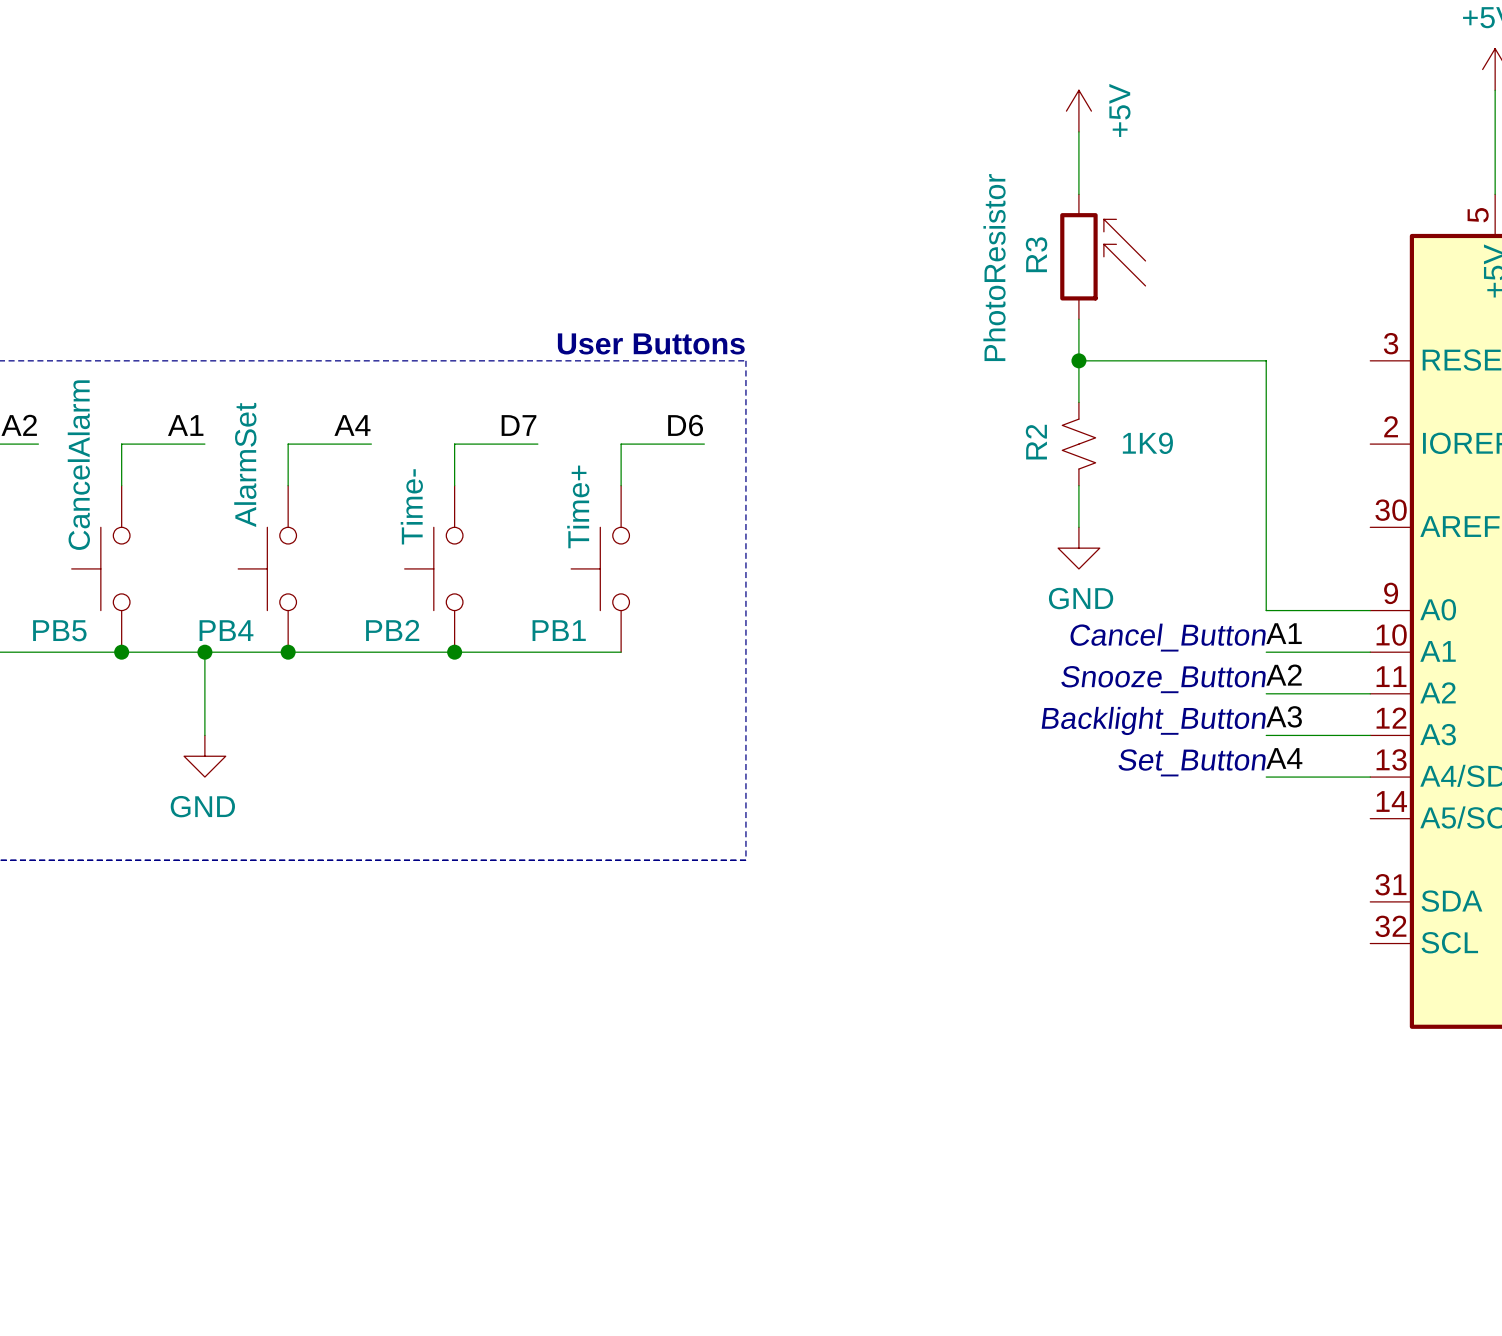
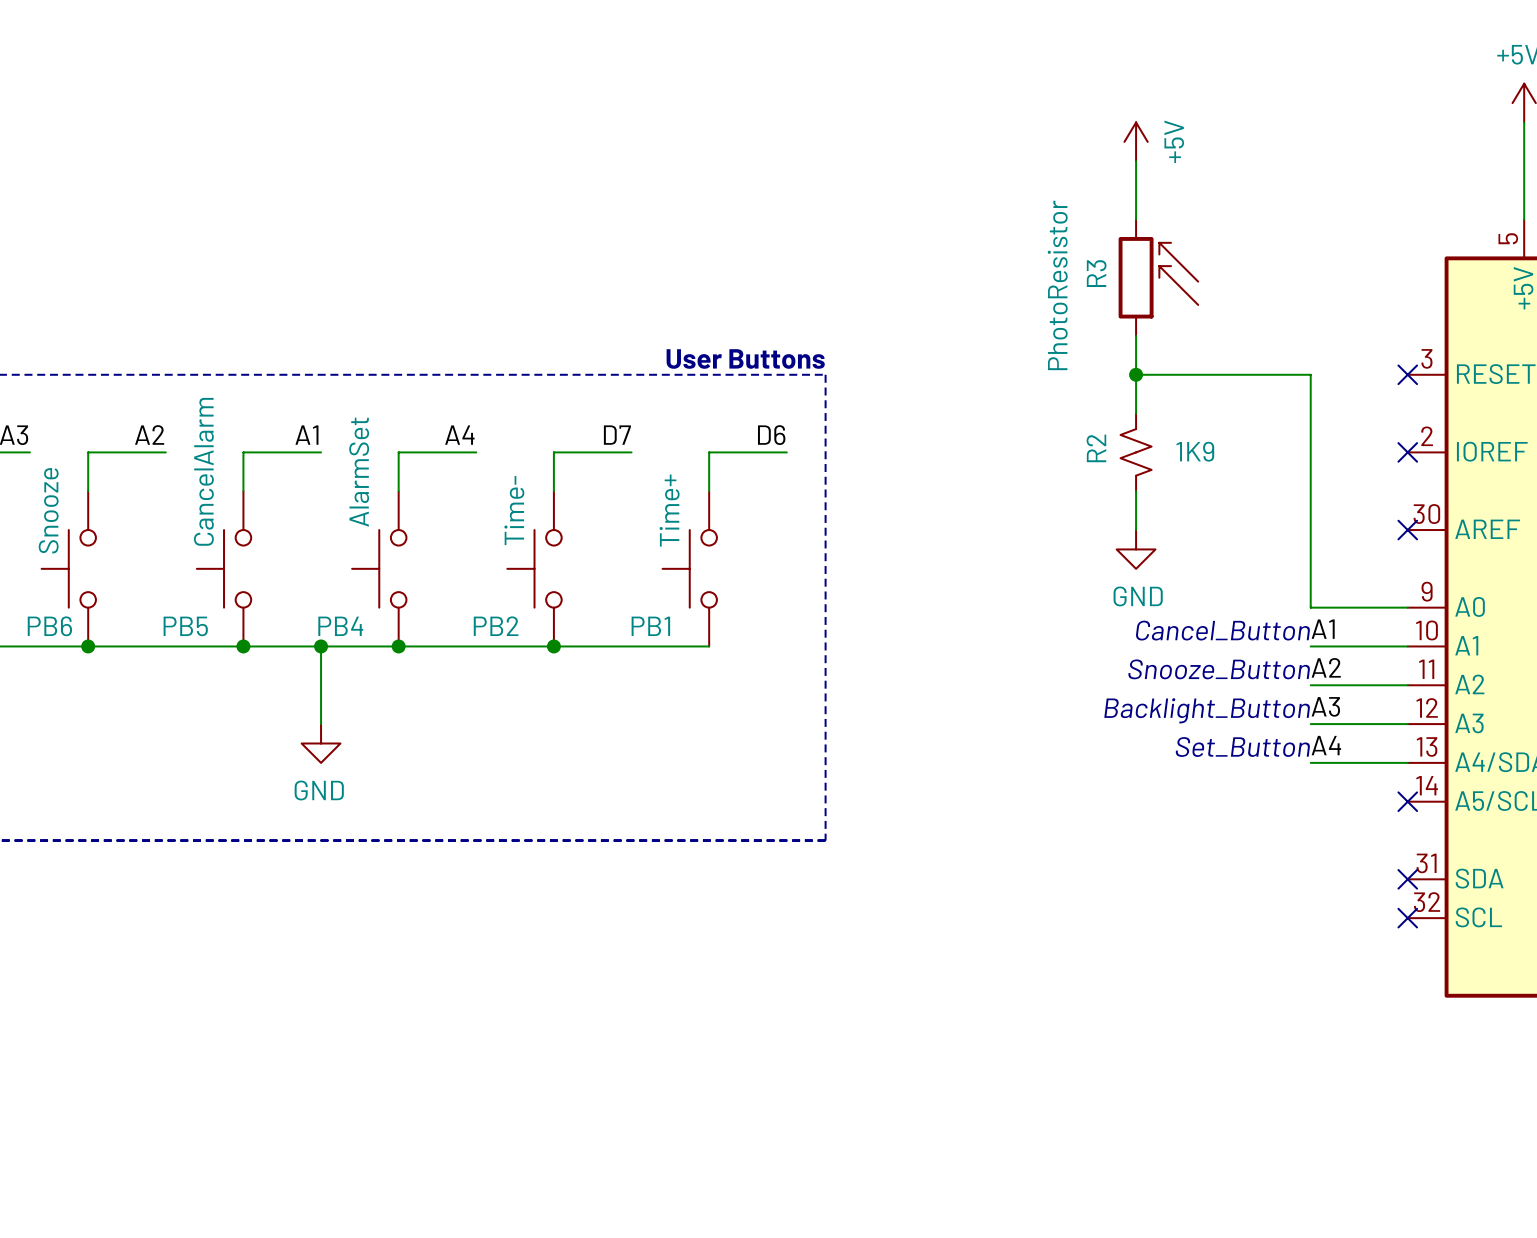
no-connect mark: none -> (1407, 374)
no-connect mark: none -> (1407, 452)
no-connect mark: none -> (1407, 530)
no-connect mark: none -> (1407, 801)
no-connect mark: none -> (1407, 879)
no-connect mark: none -> (1407, 918)

